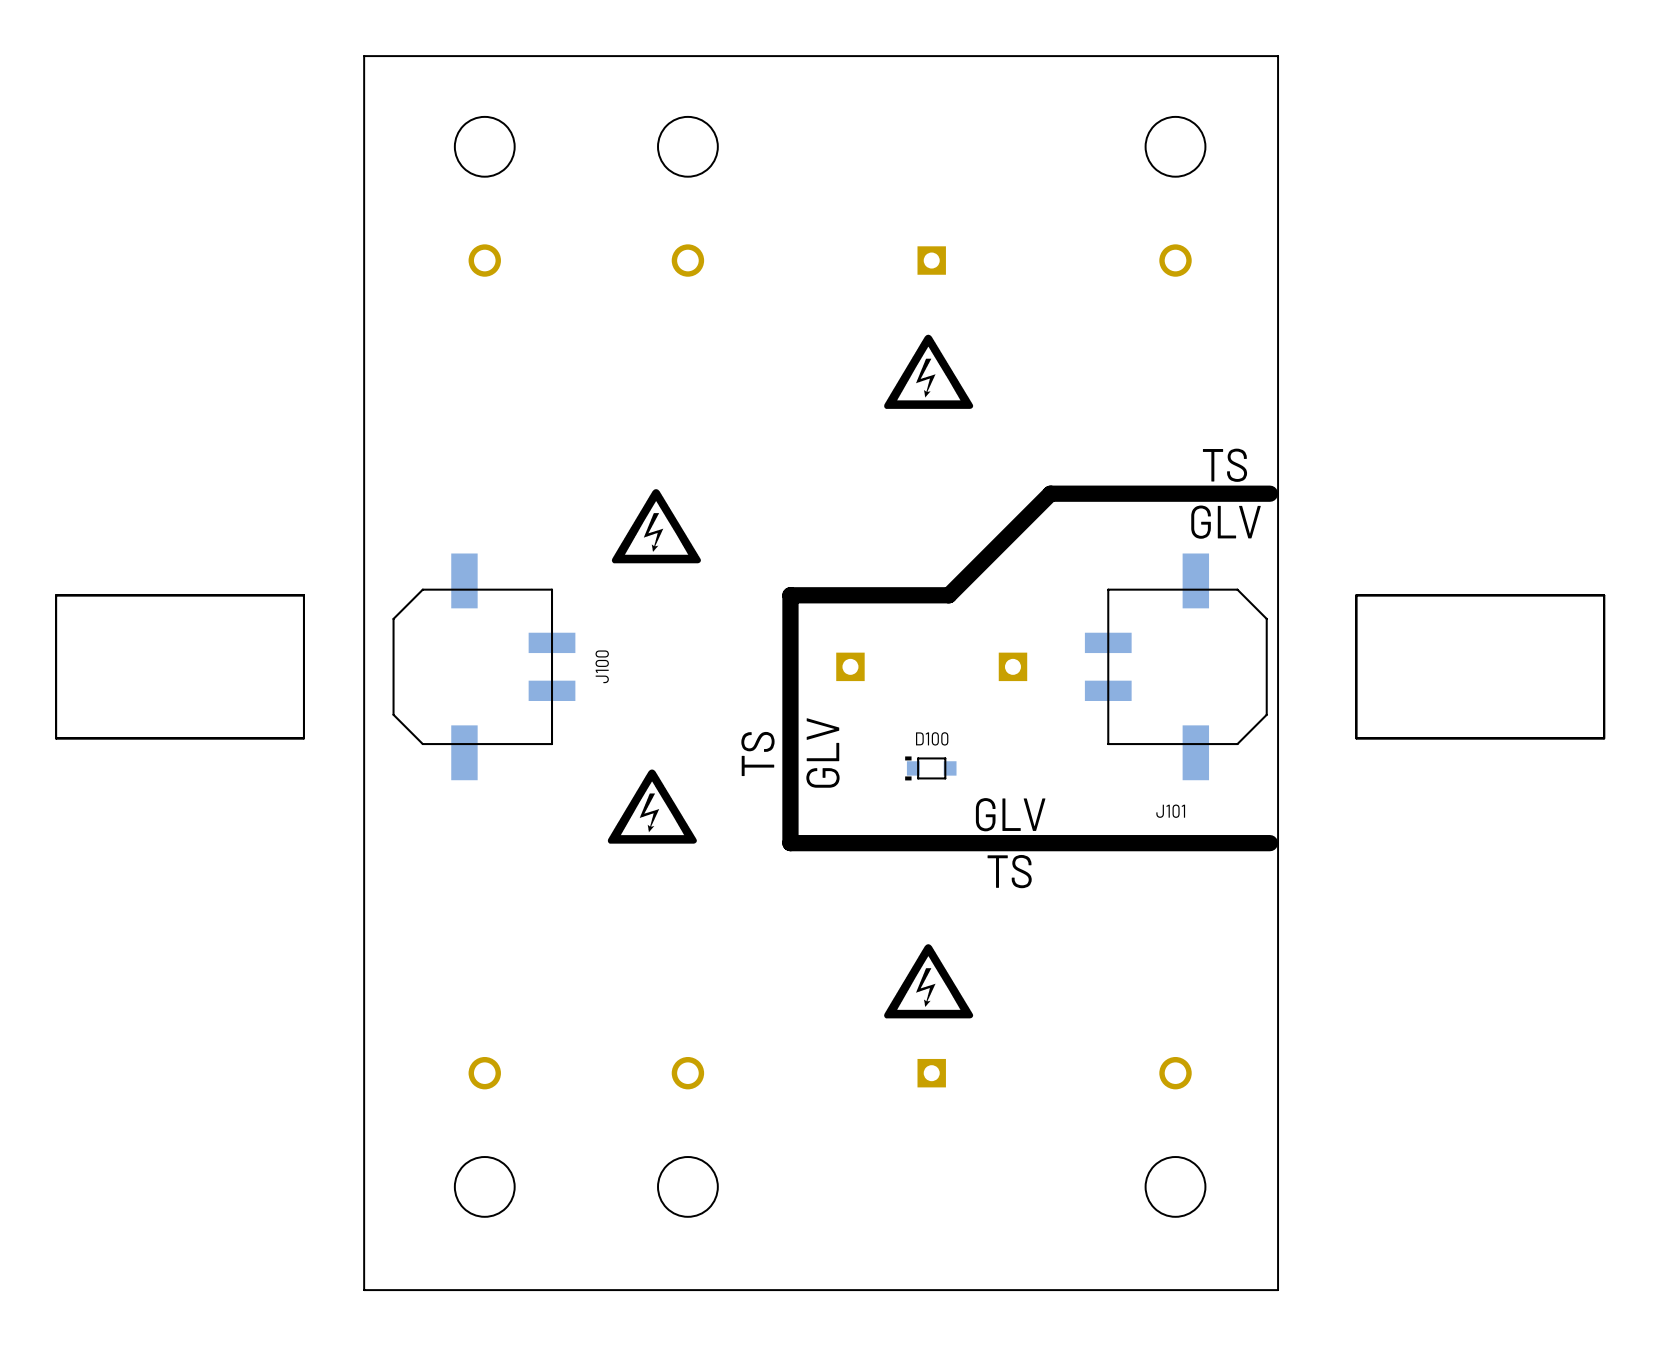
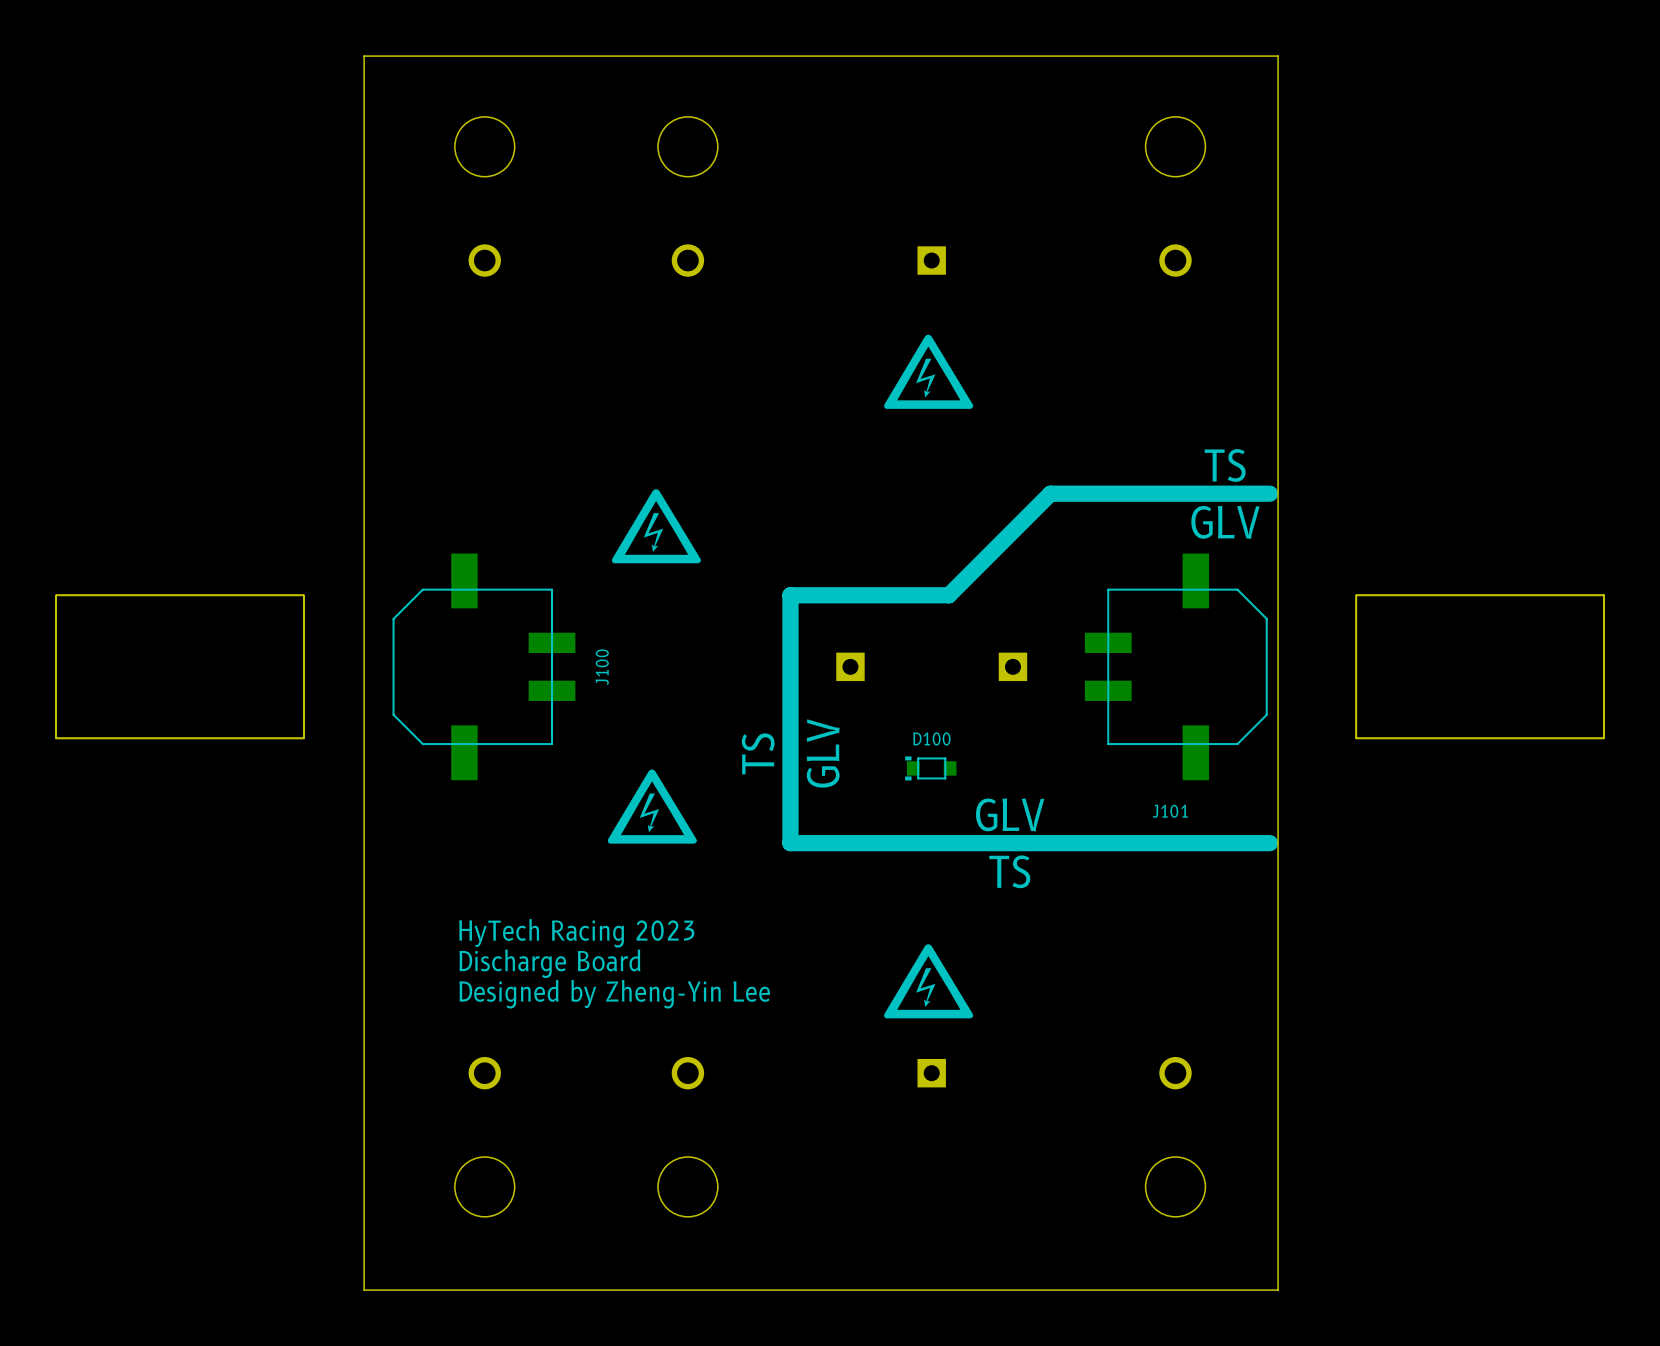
text: none -> HyTech Racing 2023 (576, 933)
text: none -> Discharge Board (549, 963)
text: none -> Designed by Zheng-Yin Lee (614, 994)

